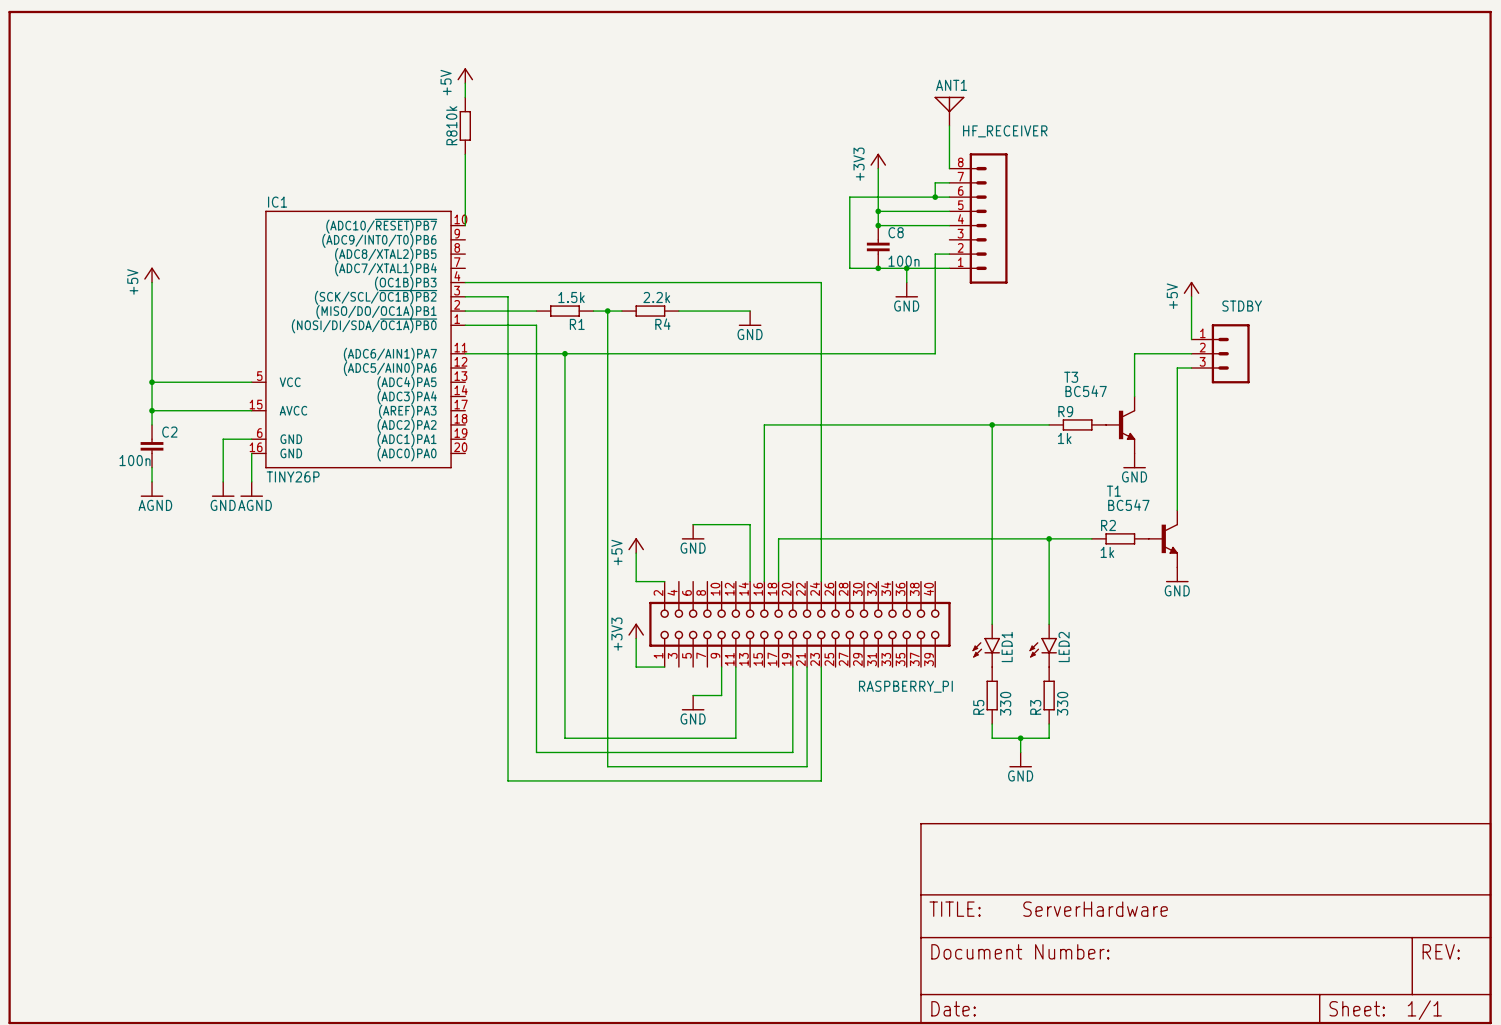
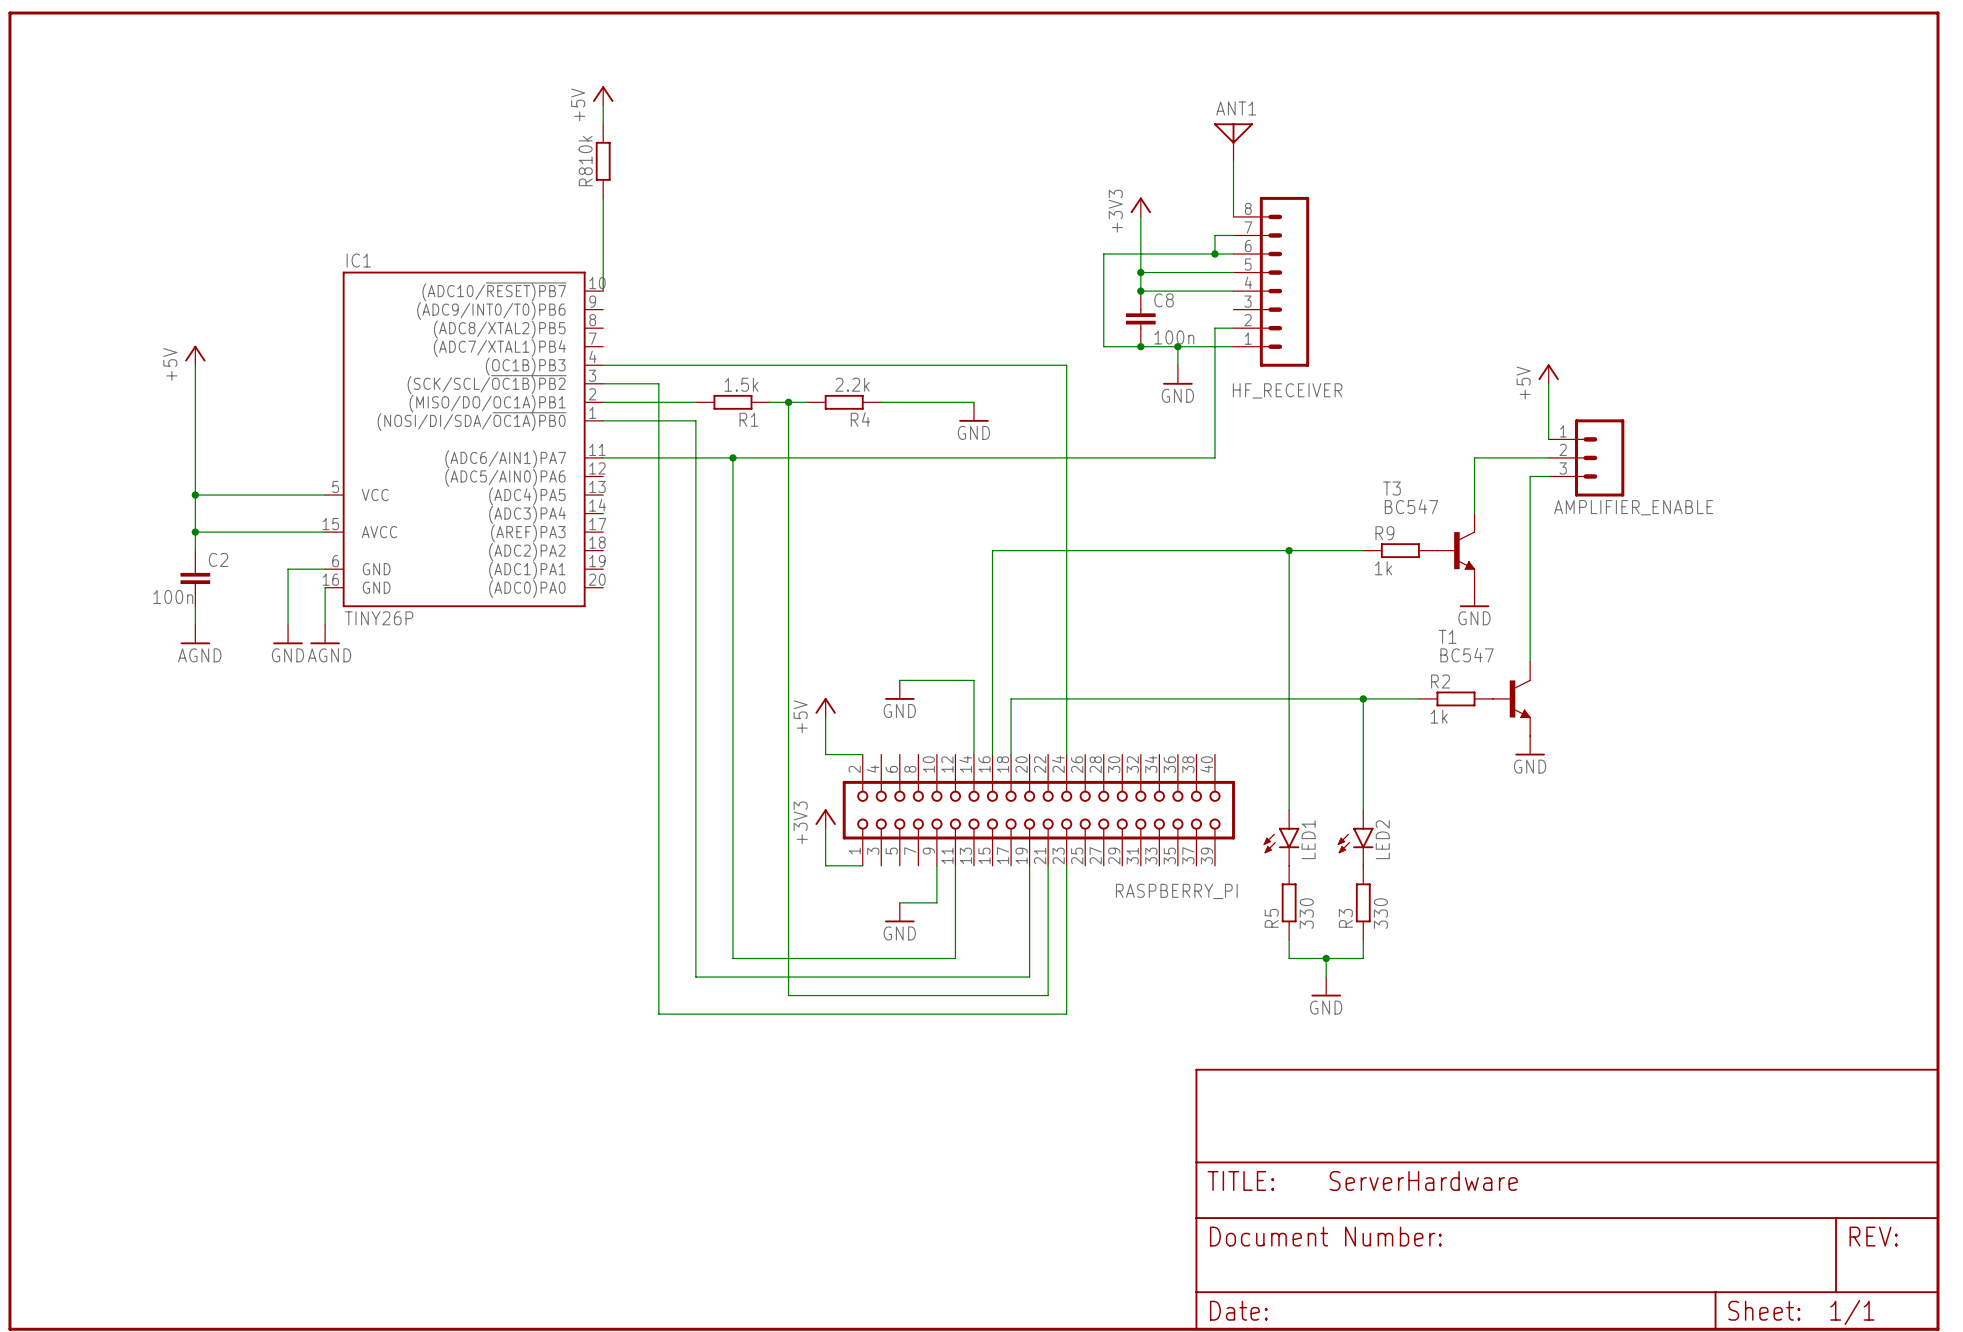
HF_RECEIVER name position: HF_RECEIVER (1005, 131) -> HF_RECEIVER (1287, 390)
STDBY name: STDBY (1242, 306) -> AMPLIFIER_ENABLE (1633, 507)

